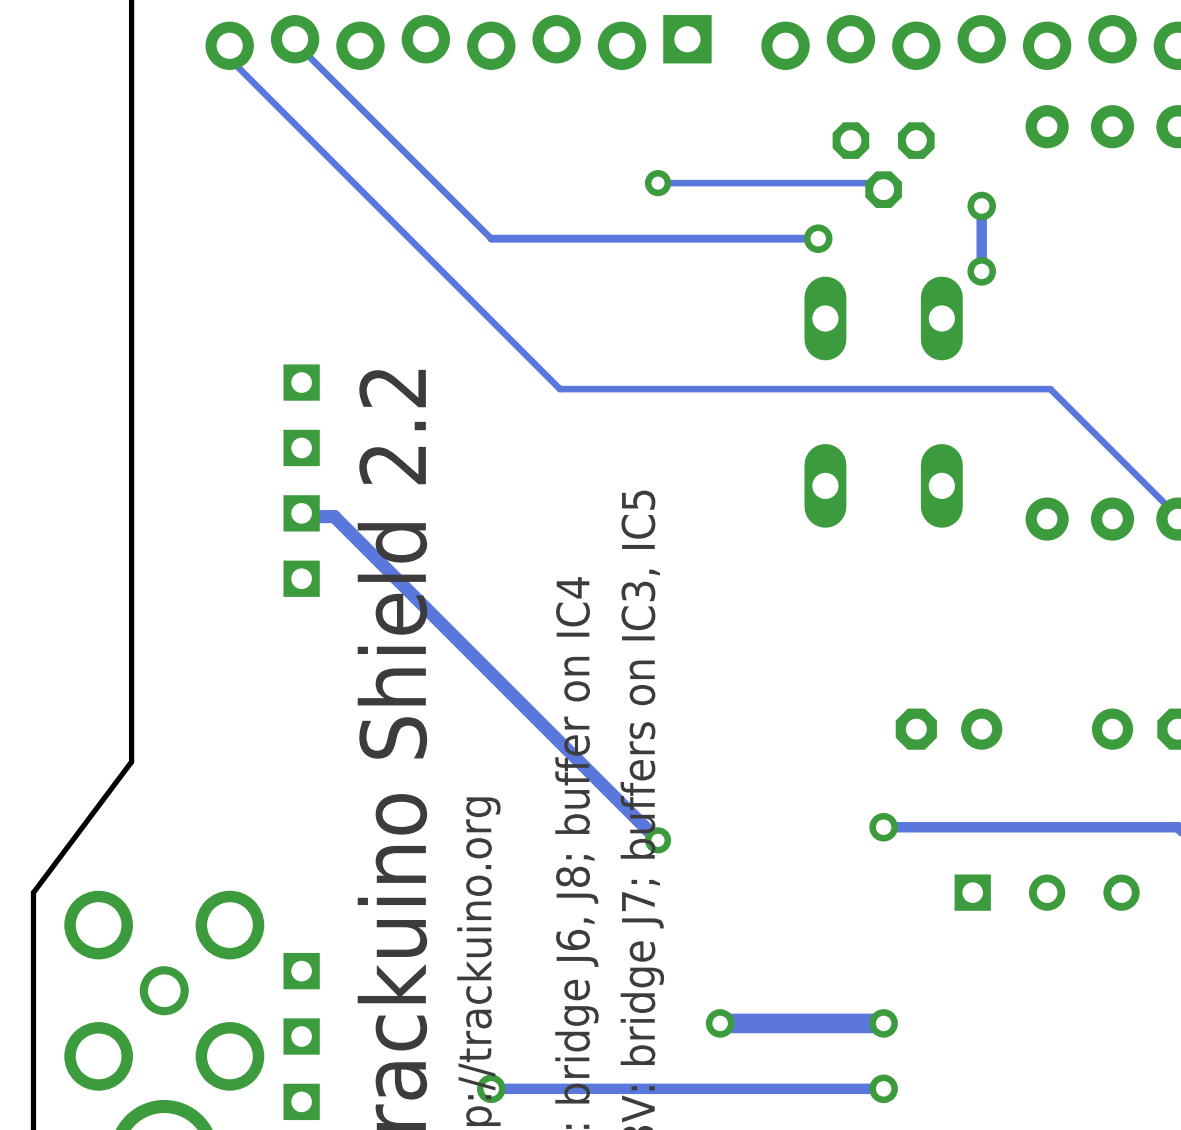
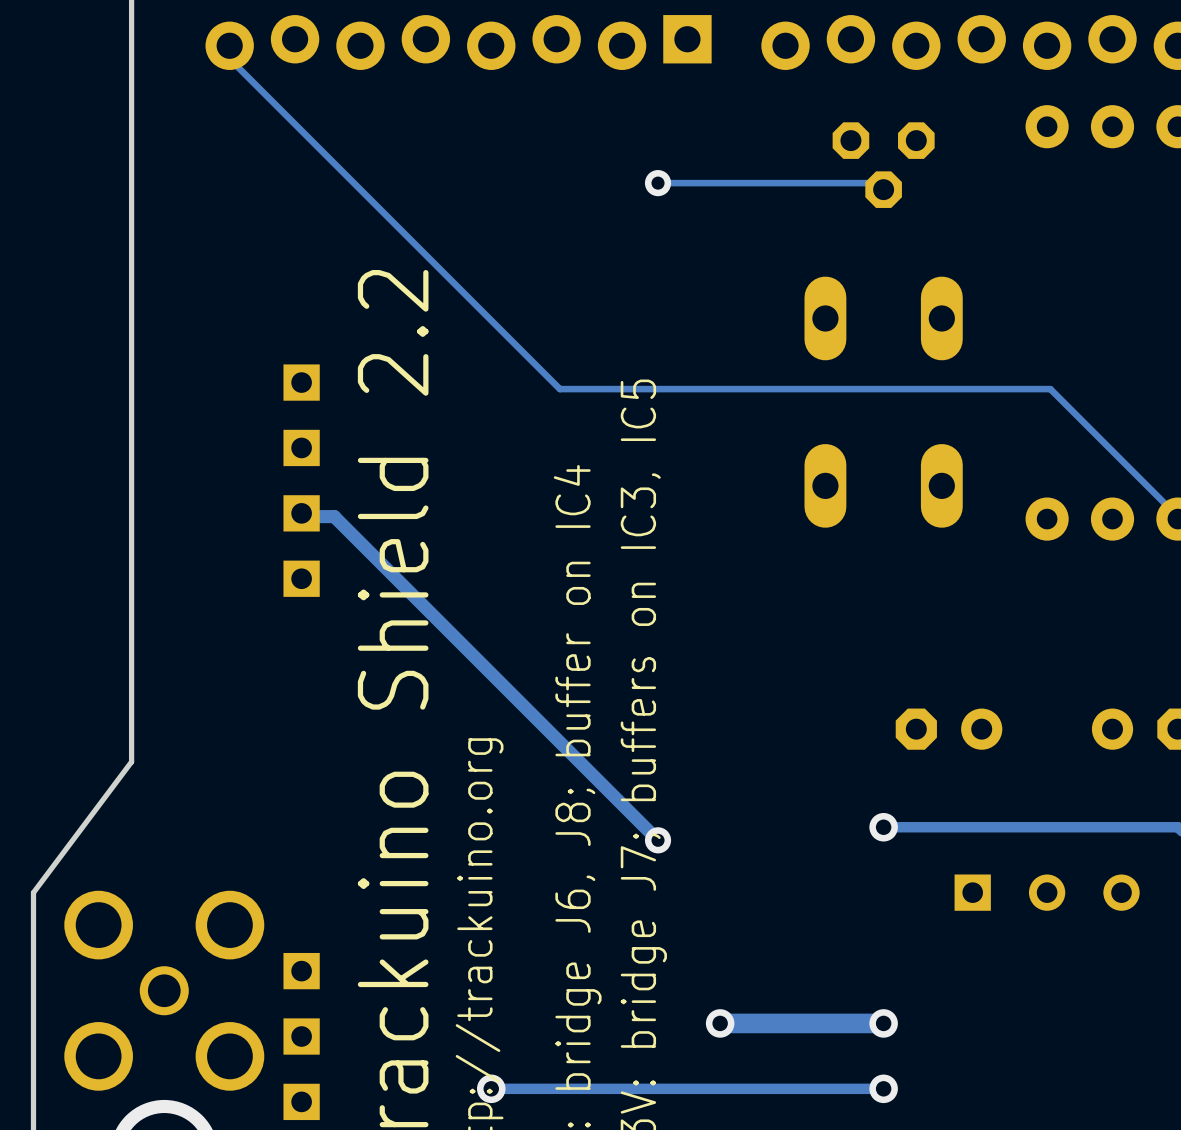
track: (295, 39) (295, 42) (491, 238) (818, 238) -> none
track: (981, 206) (981, 271) -> none
via: (981, 206) -> none
via: (818, 238) -> none
via: (981, 271) -> none

